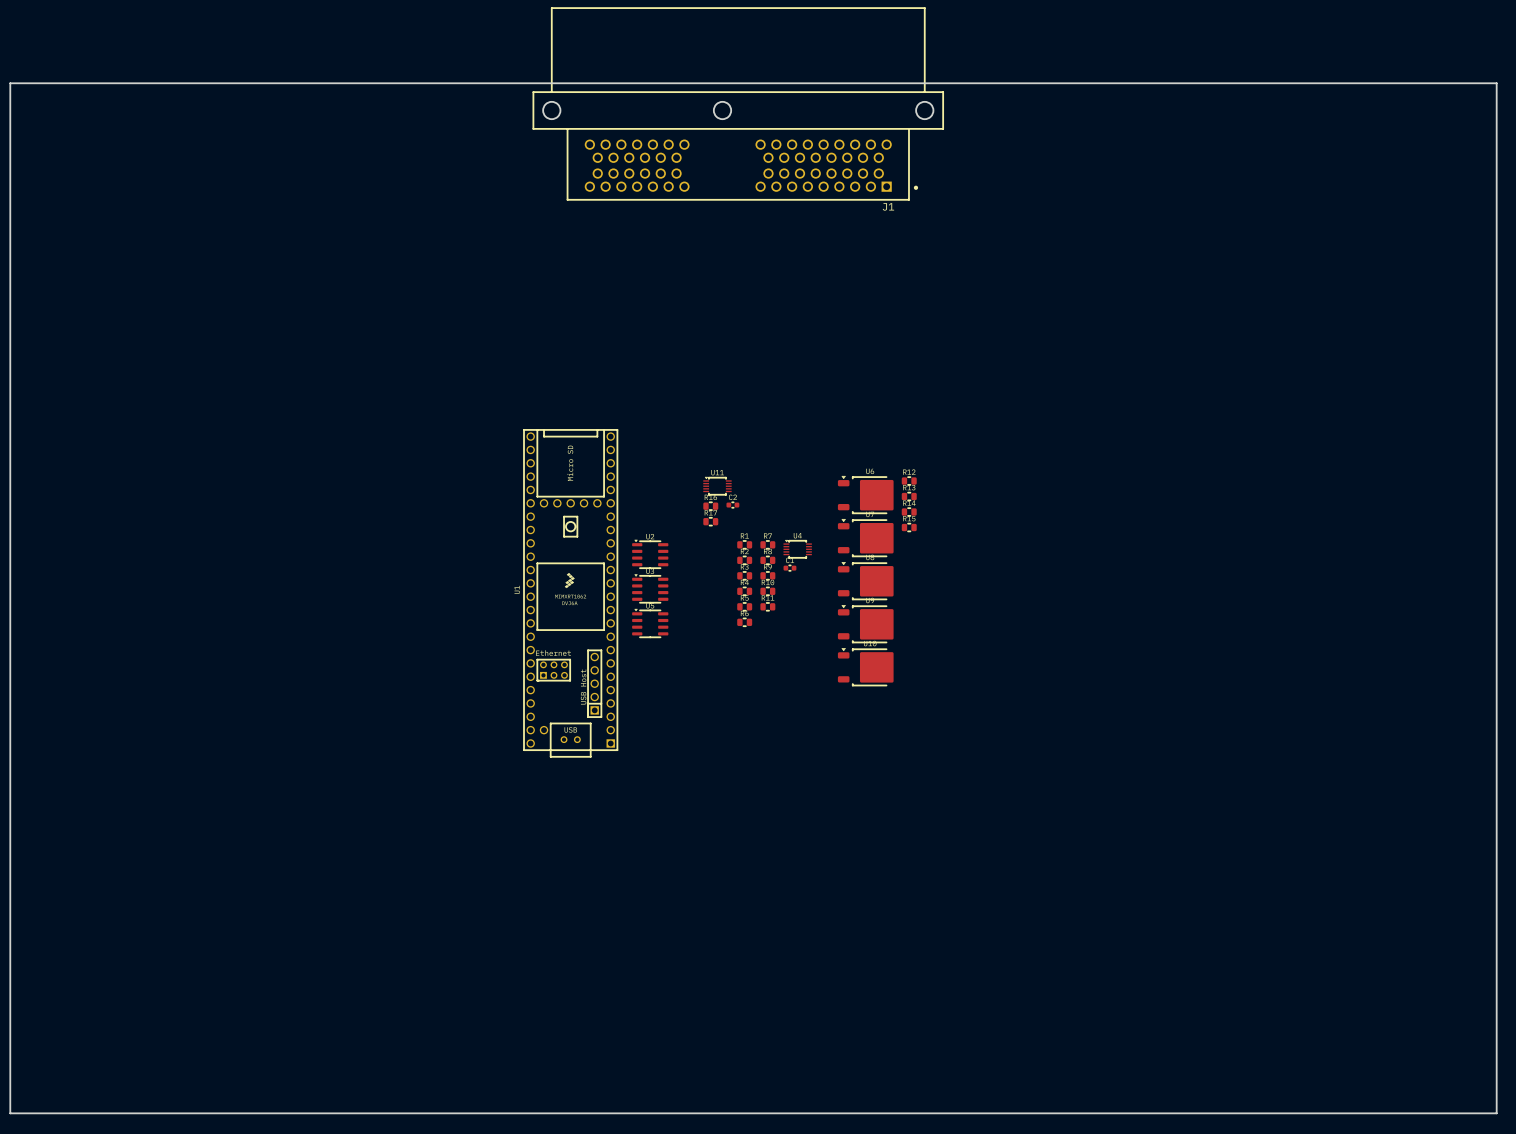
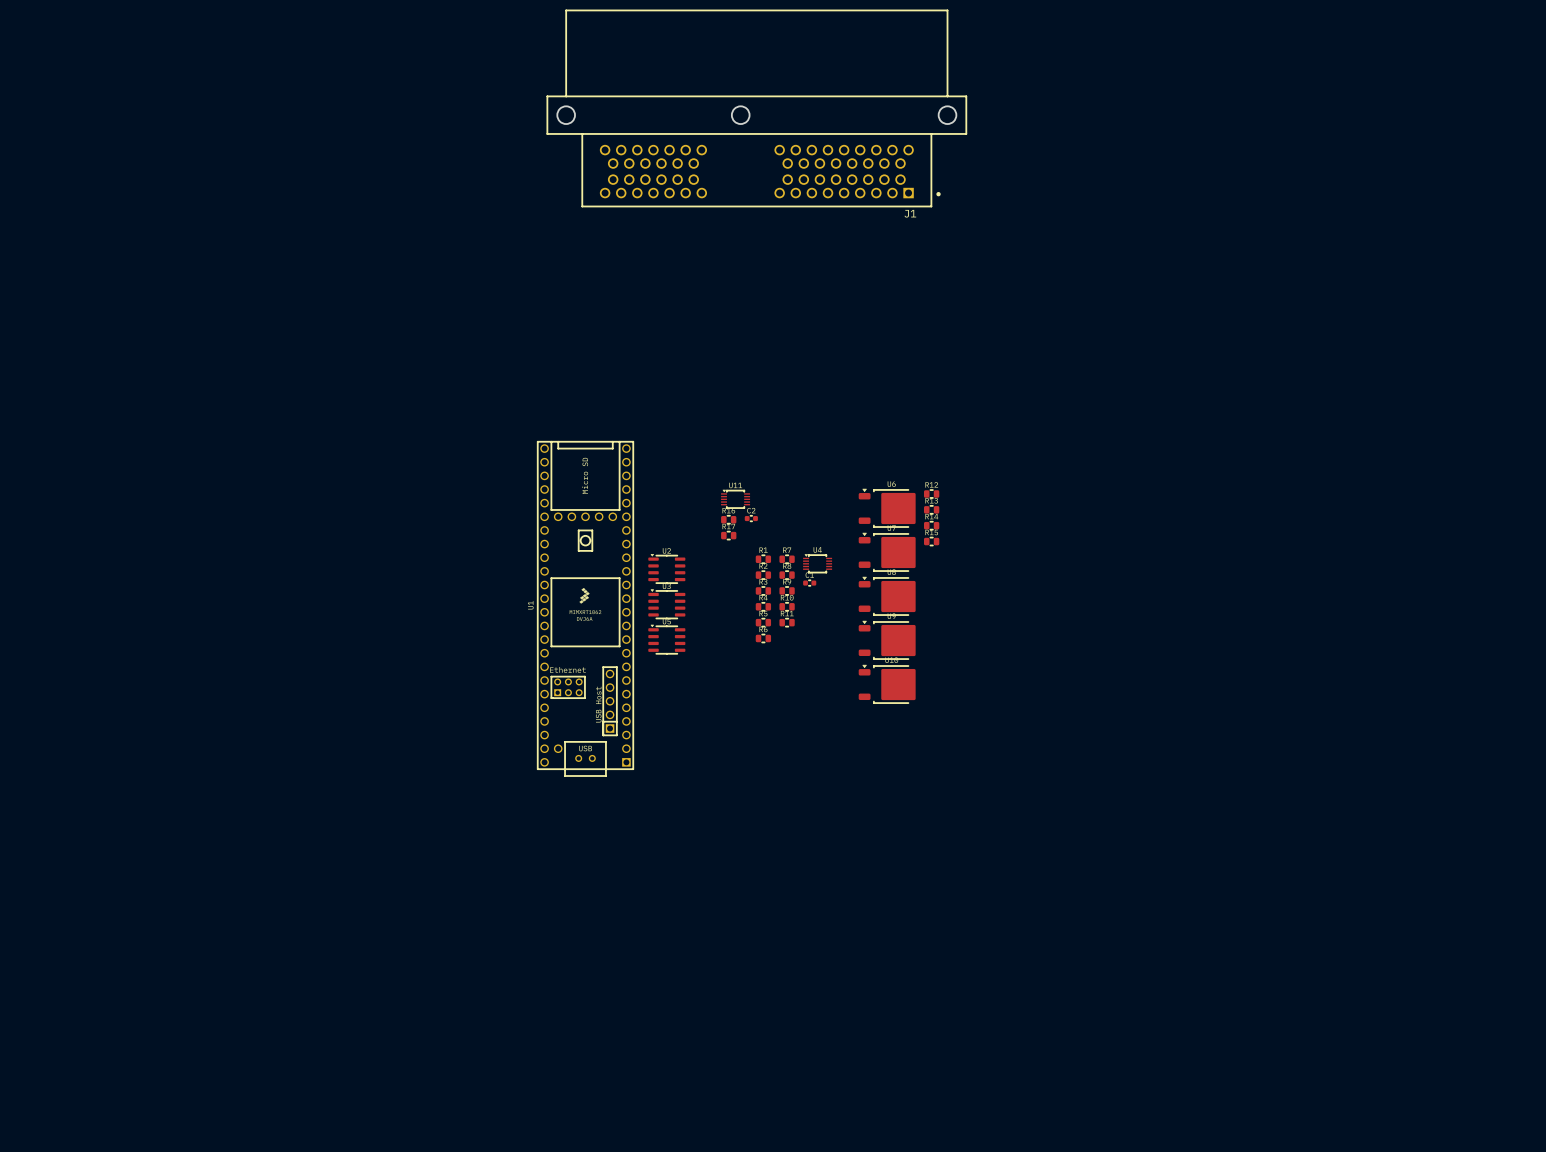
board edge: (10, 83) (1496, 83) (1496, 1113) (10, 1113) (10, 83) -> none

